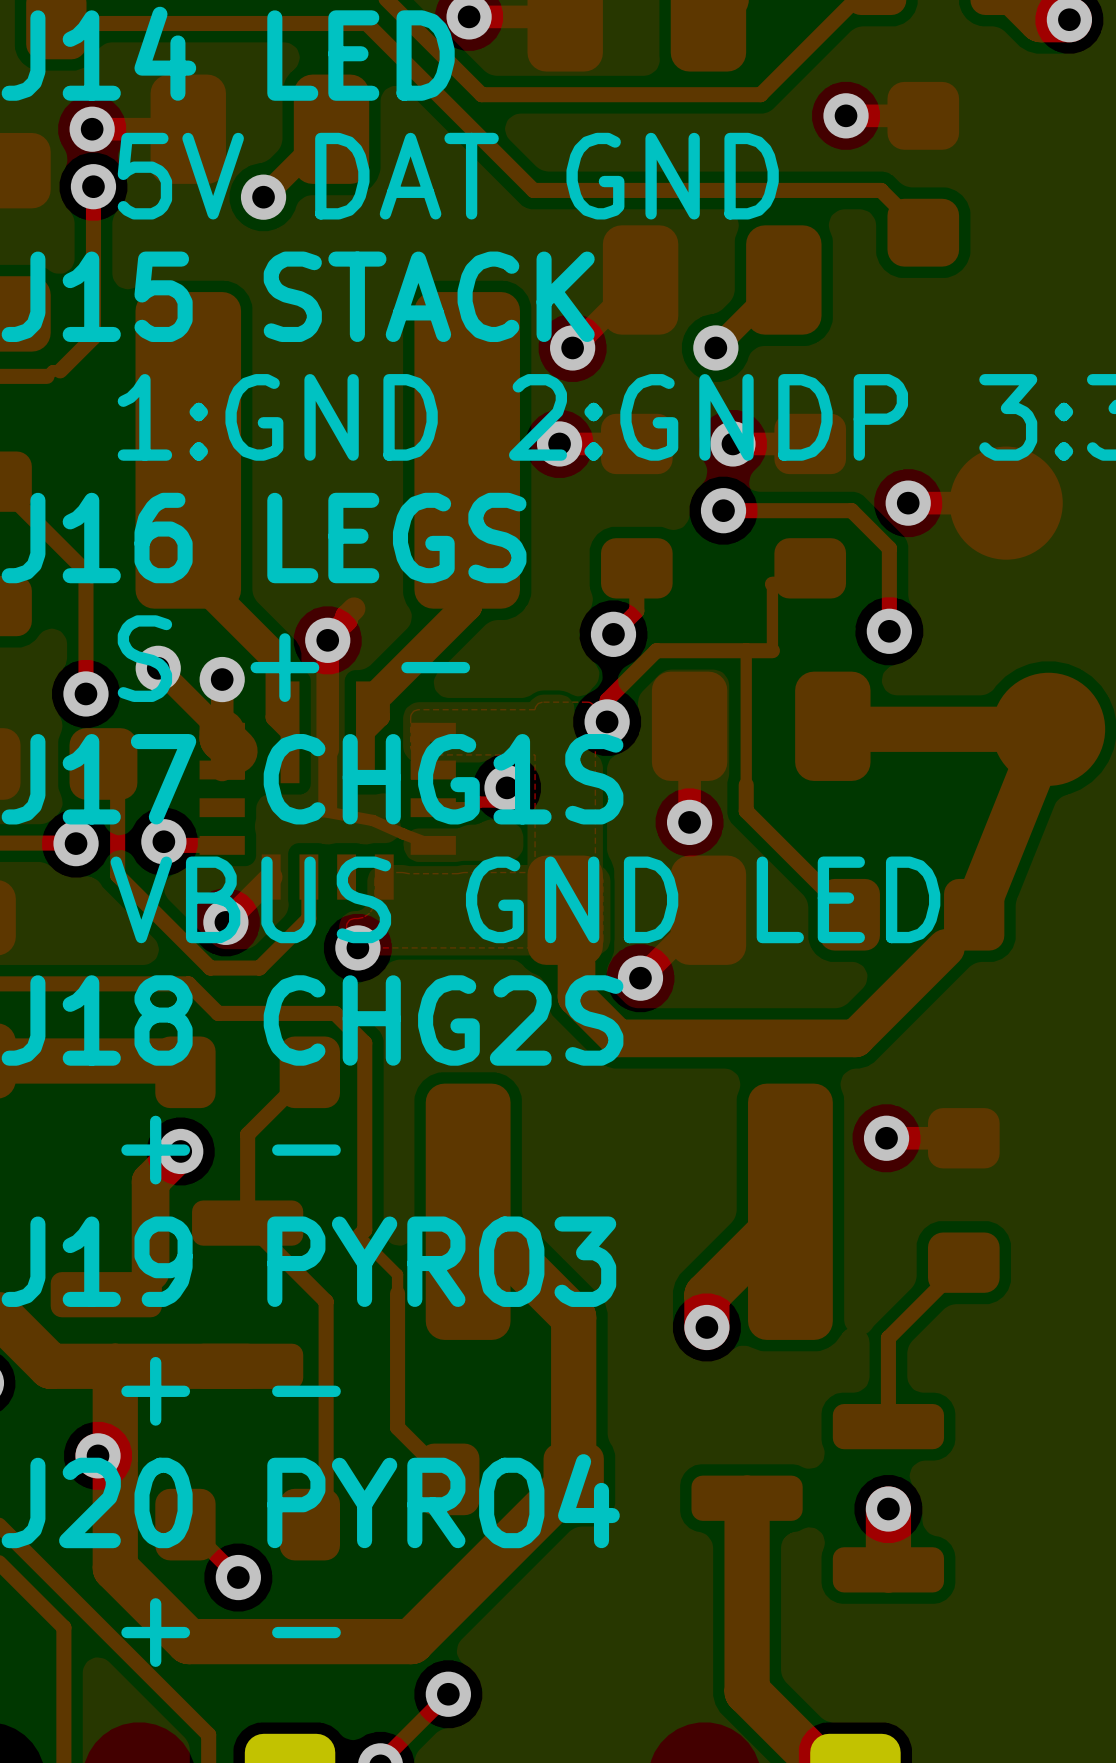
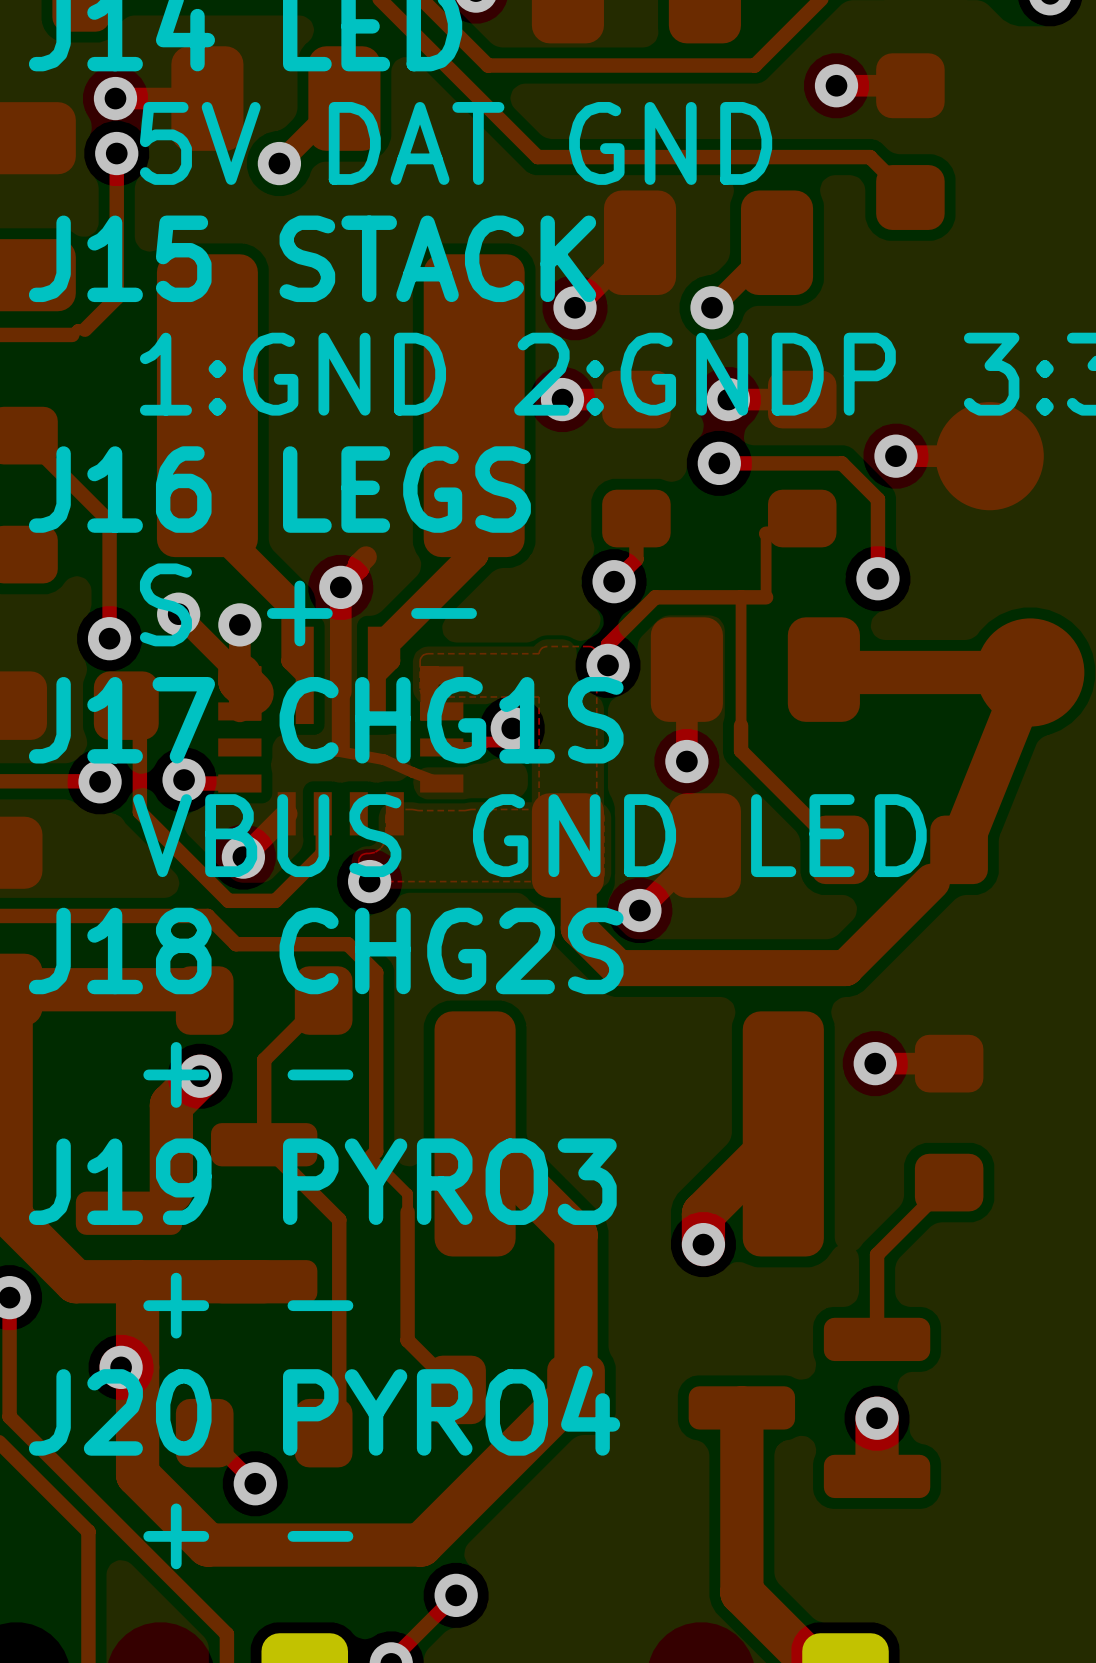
top track width: thin (180, 1151) (150, 1181) (150, 1272) -> thick (200, 1076) (171, 1105) (171, 1191)

